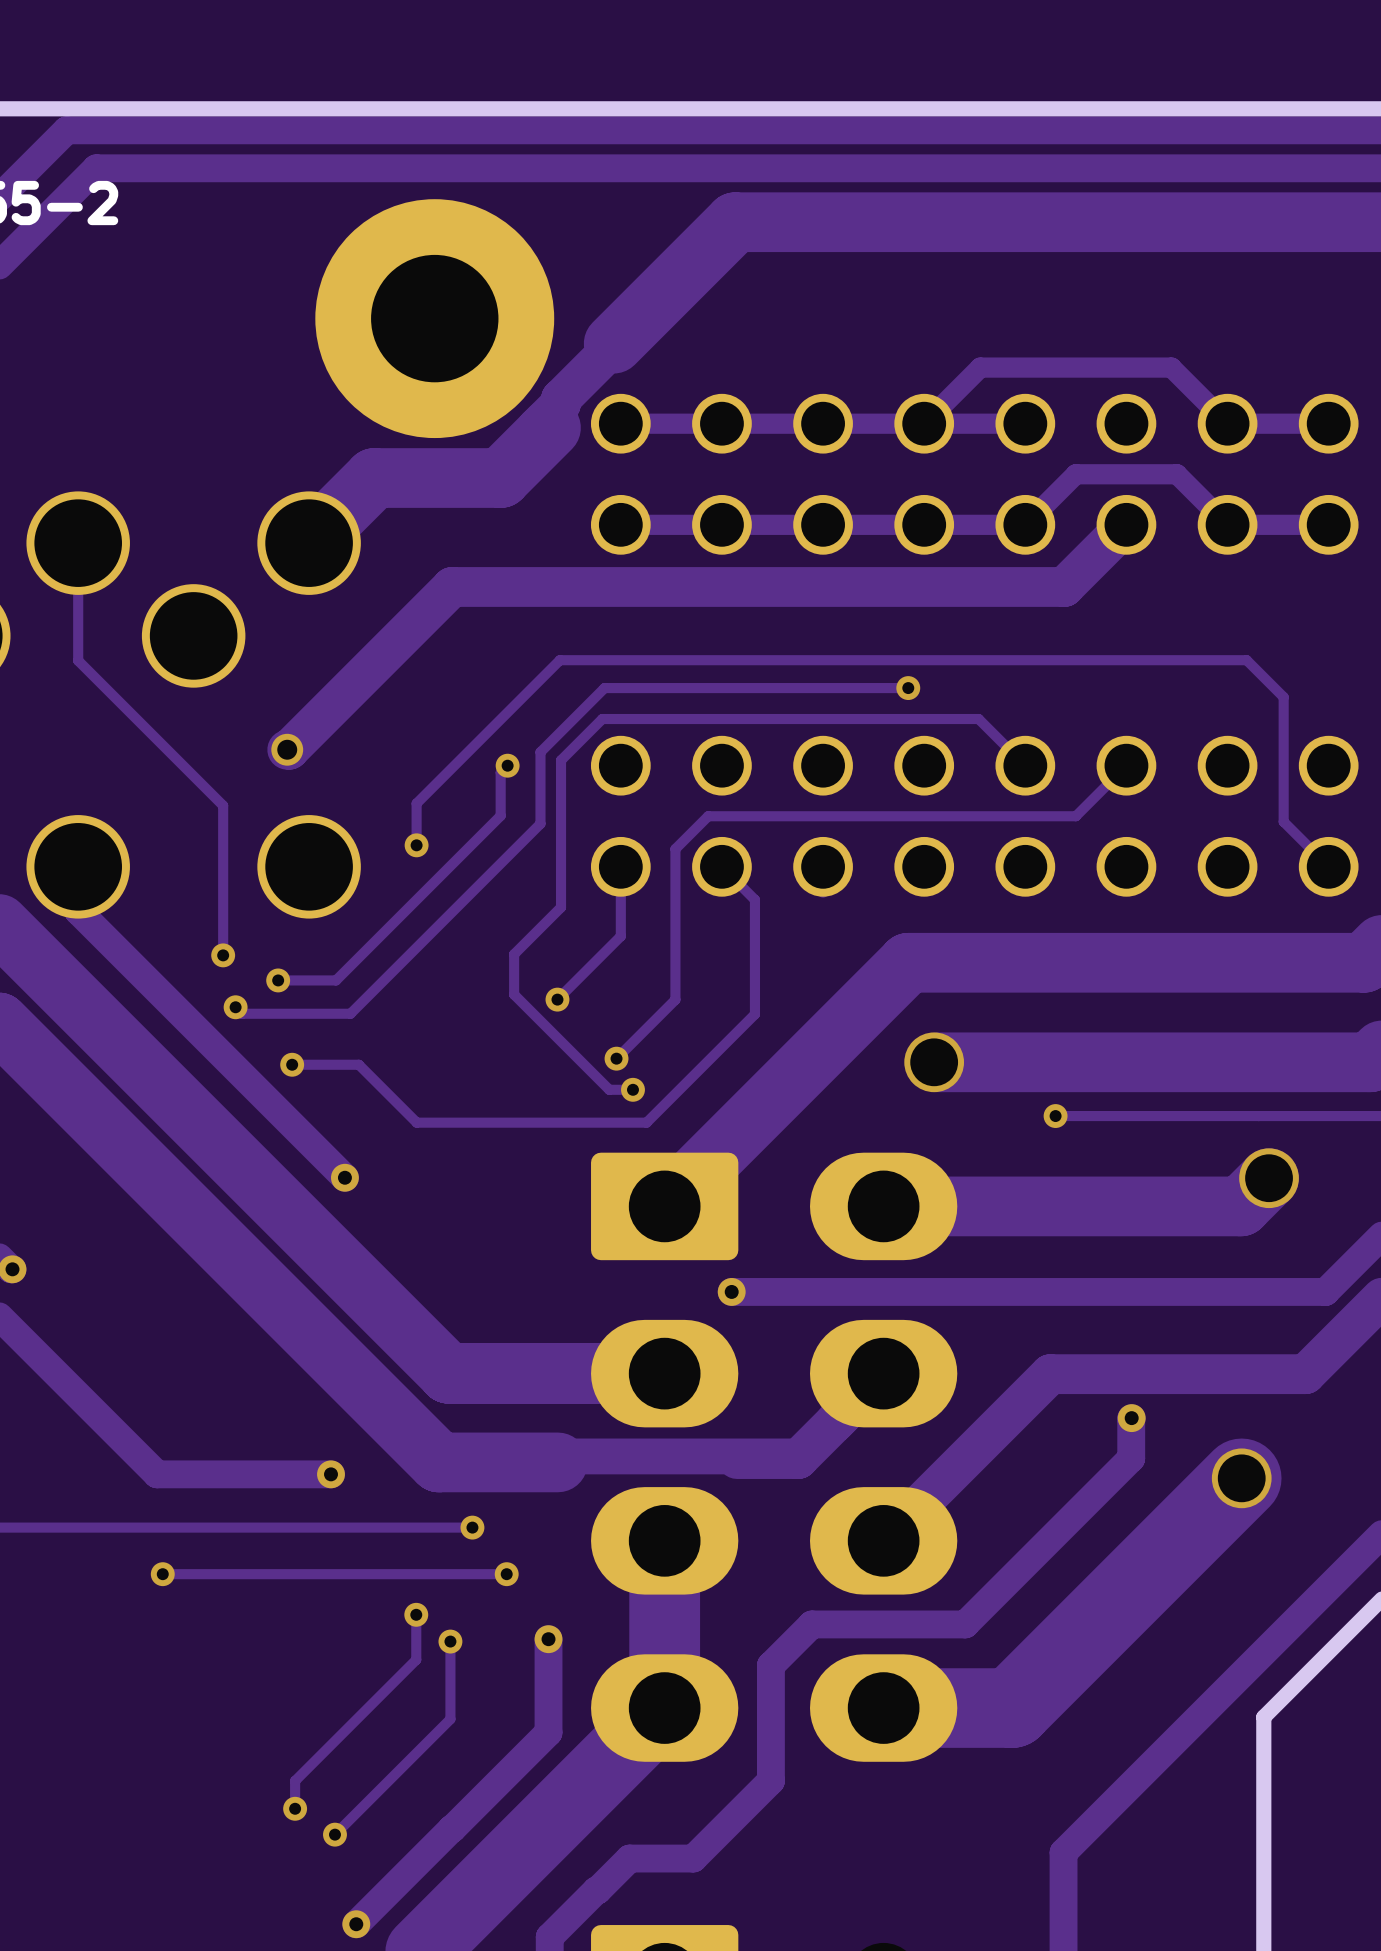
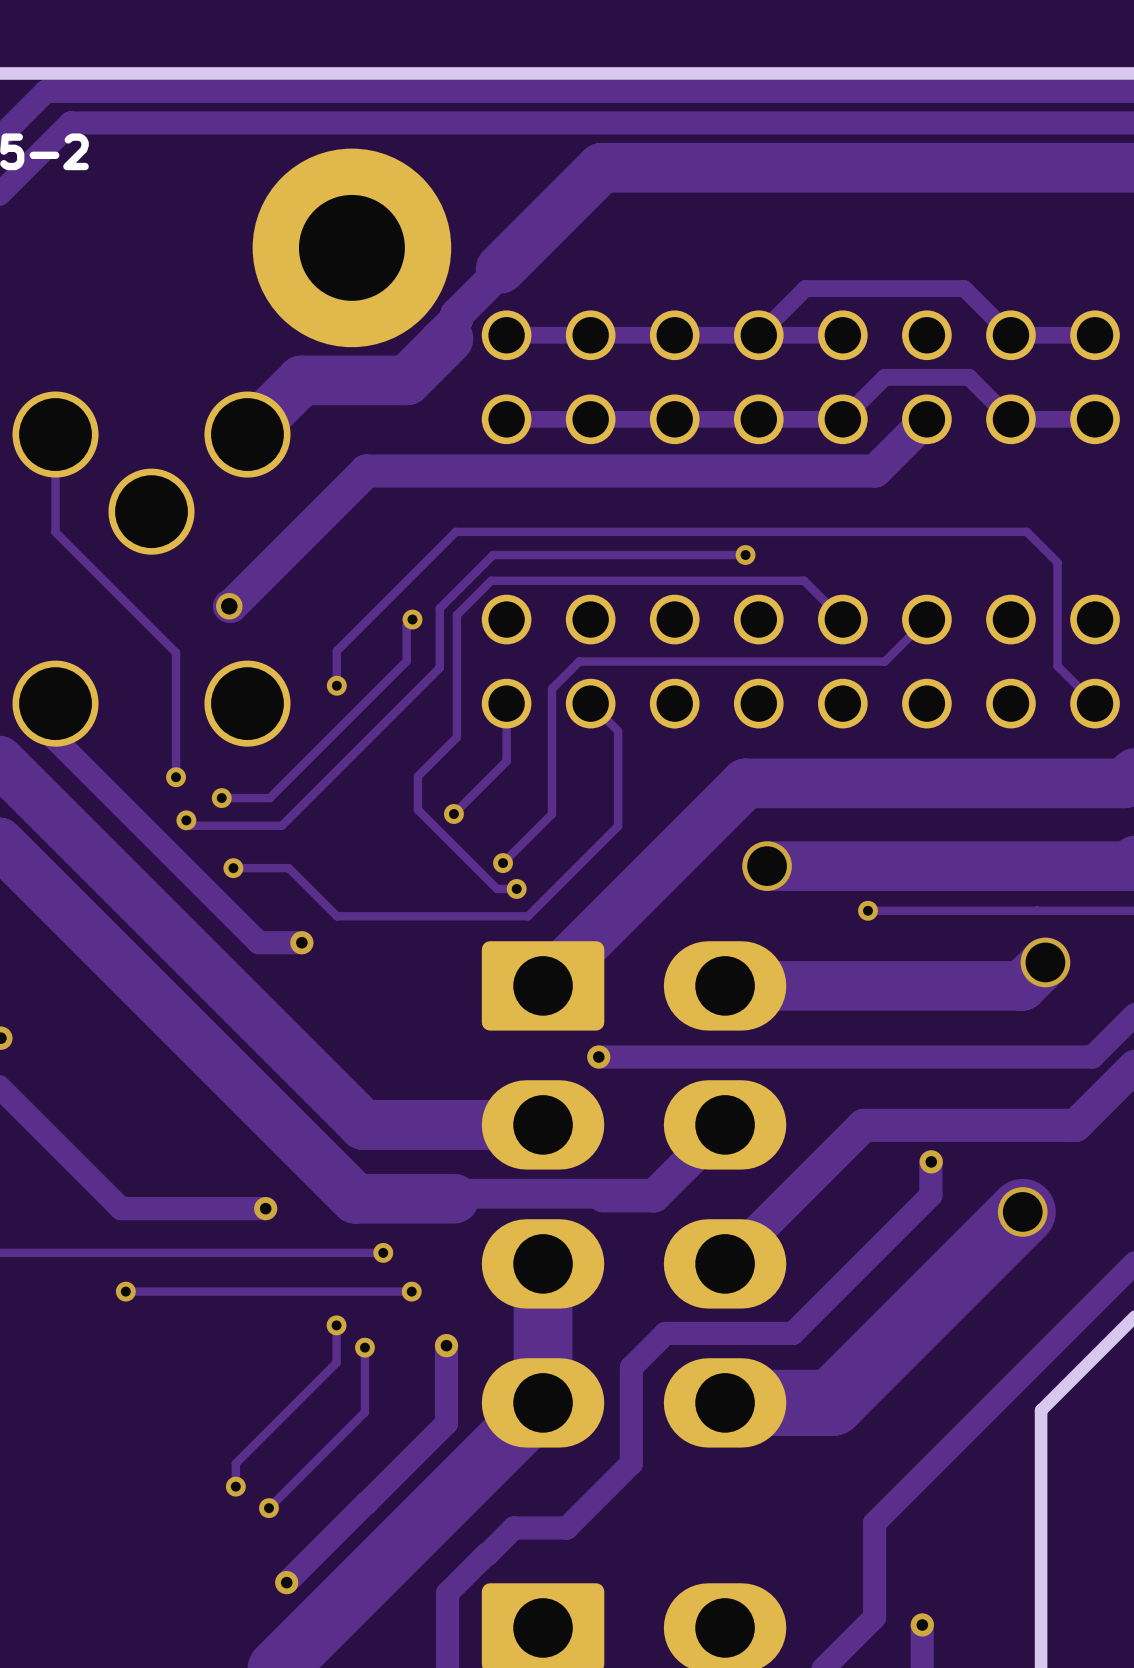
track: (78, 909) (344, 1177) -> (55, 739) (258, 942) (301, 942)
via position: (344, 1177) -> (301, 942)

